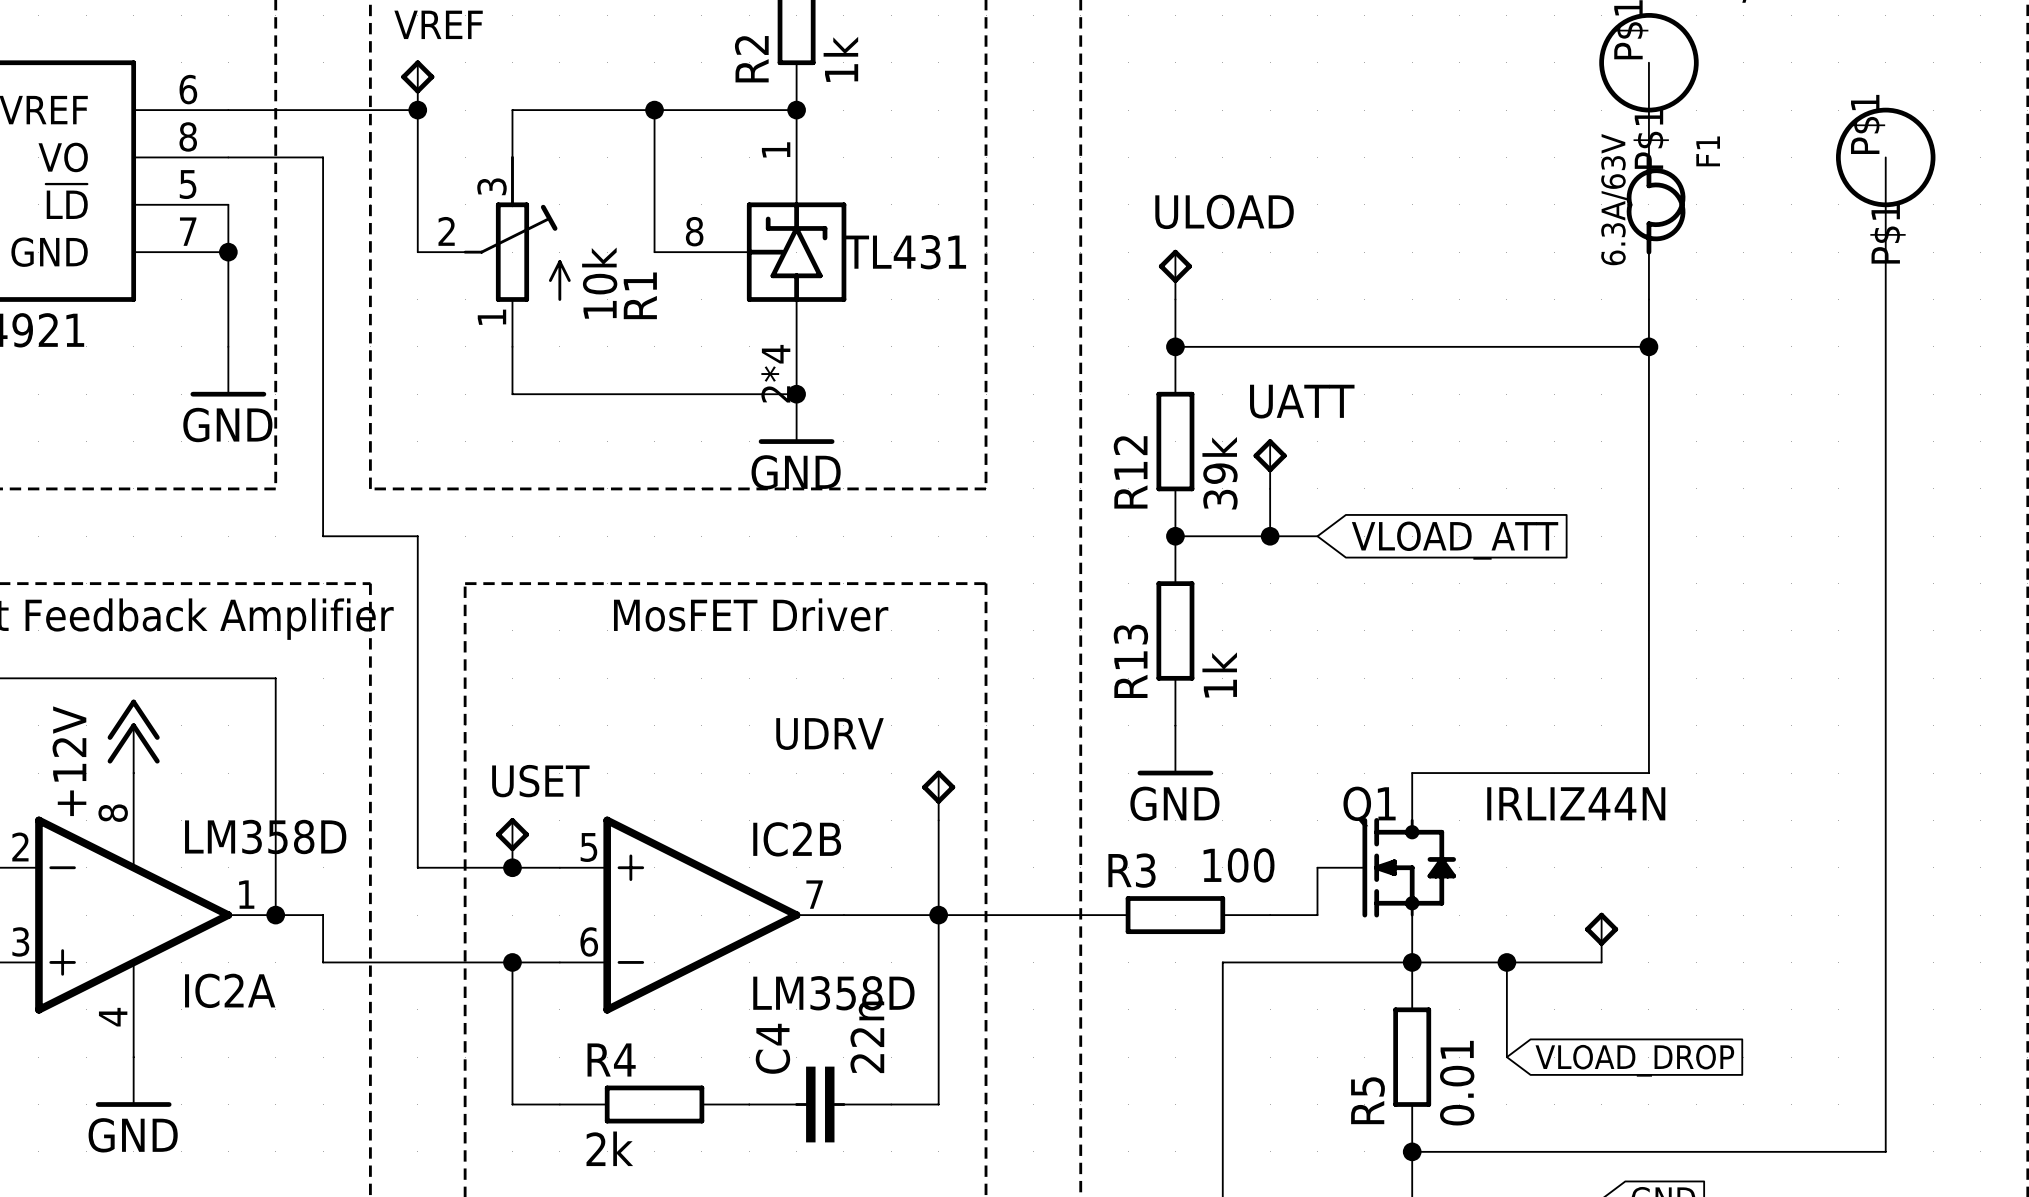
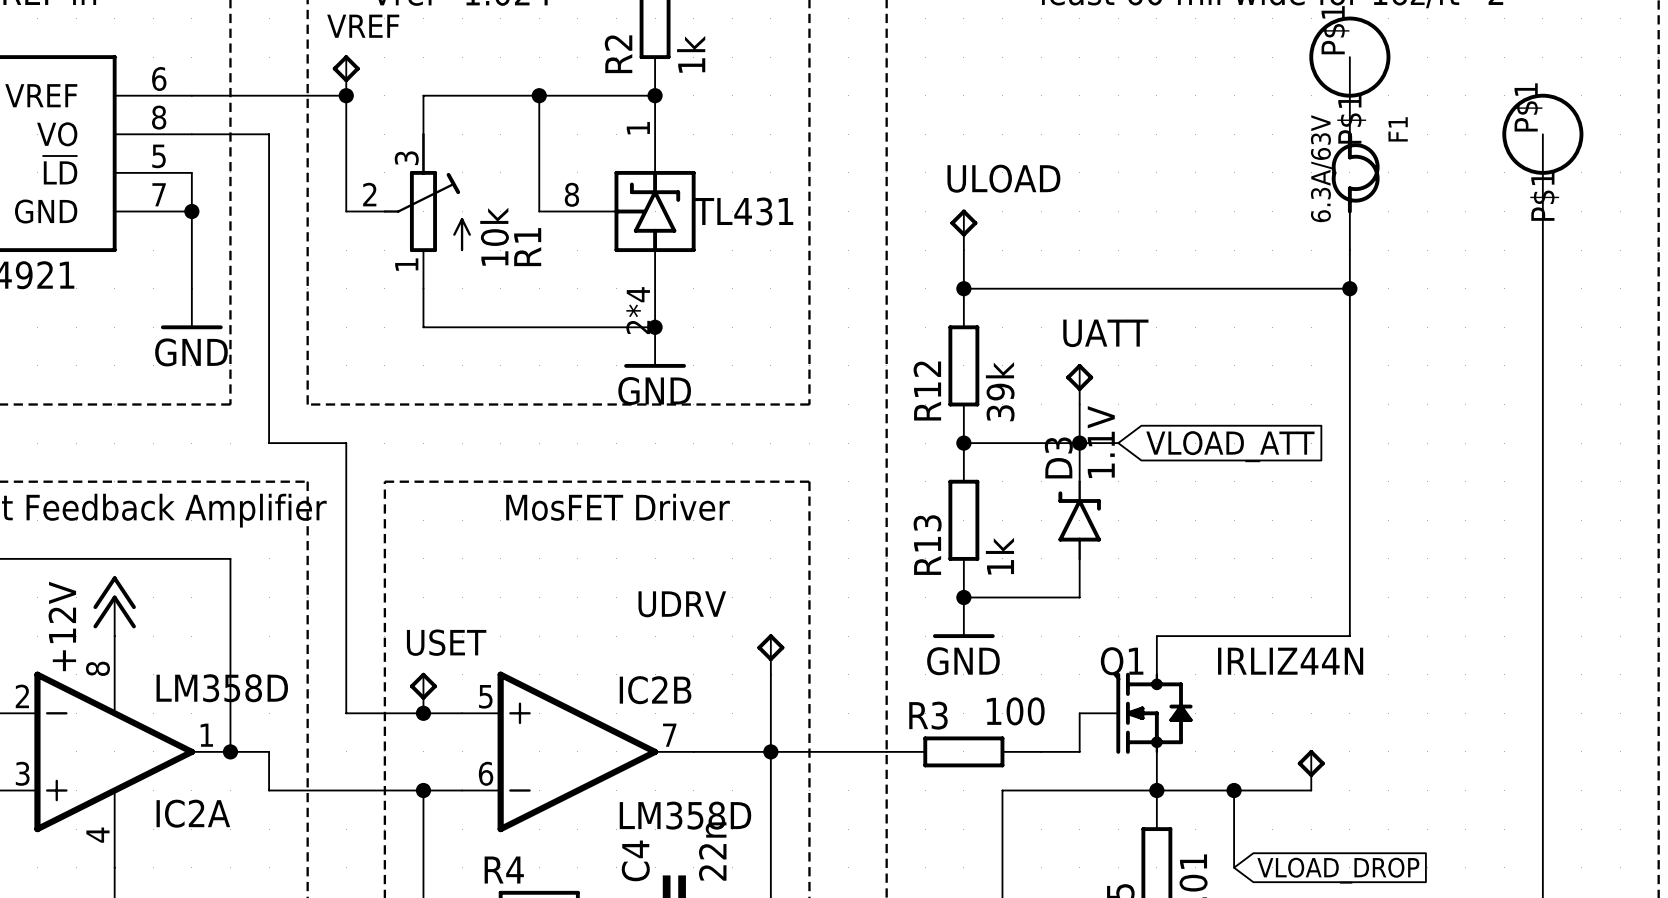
UATT position: (1270, 464) -> (1079, 384)
wire: (1270, 488) (1270, 536) -> none
wire: none -> (1079, 404) (1079, 481)
junction position: (1270, 536) -> (1079, 443)
wire: none -> (1079, 443) (1118, 443)
global label position: VLOAD_ATT (1455, 540) -> VLOAD_ATT (1230, 446)
D3: none -> 1.1V (1079, 520)
wire: none -> (1079, 558) (1079, 597) (963, 597)
junction: none -> (963, 597)

